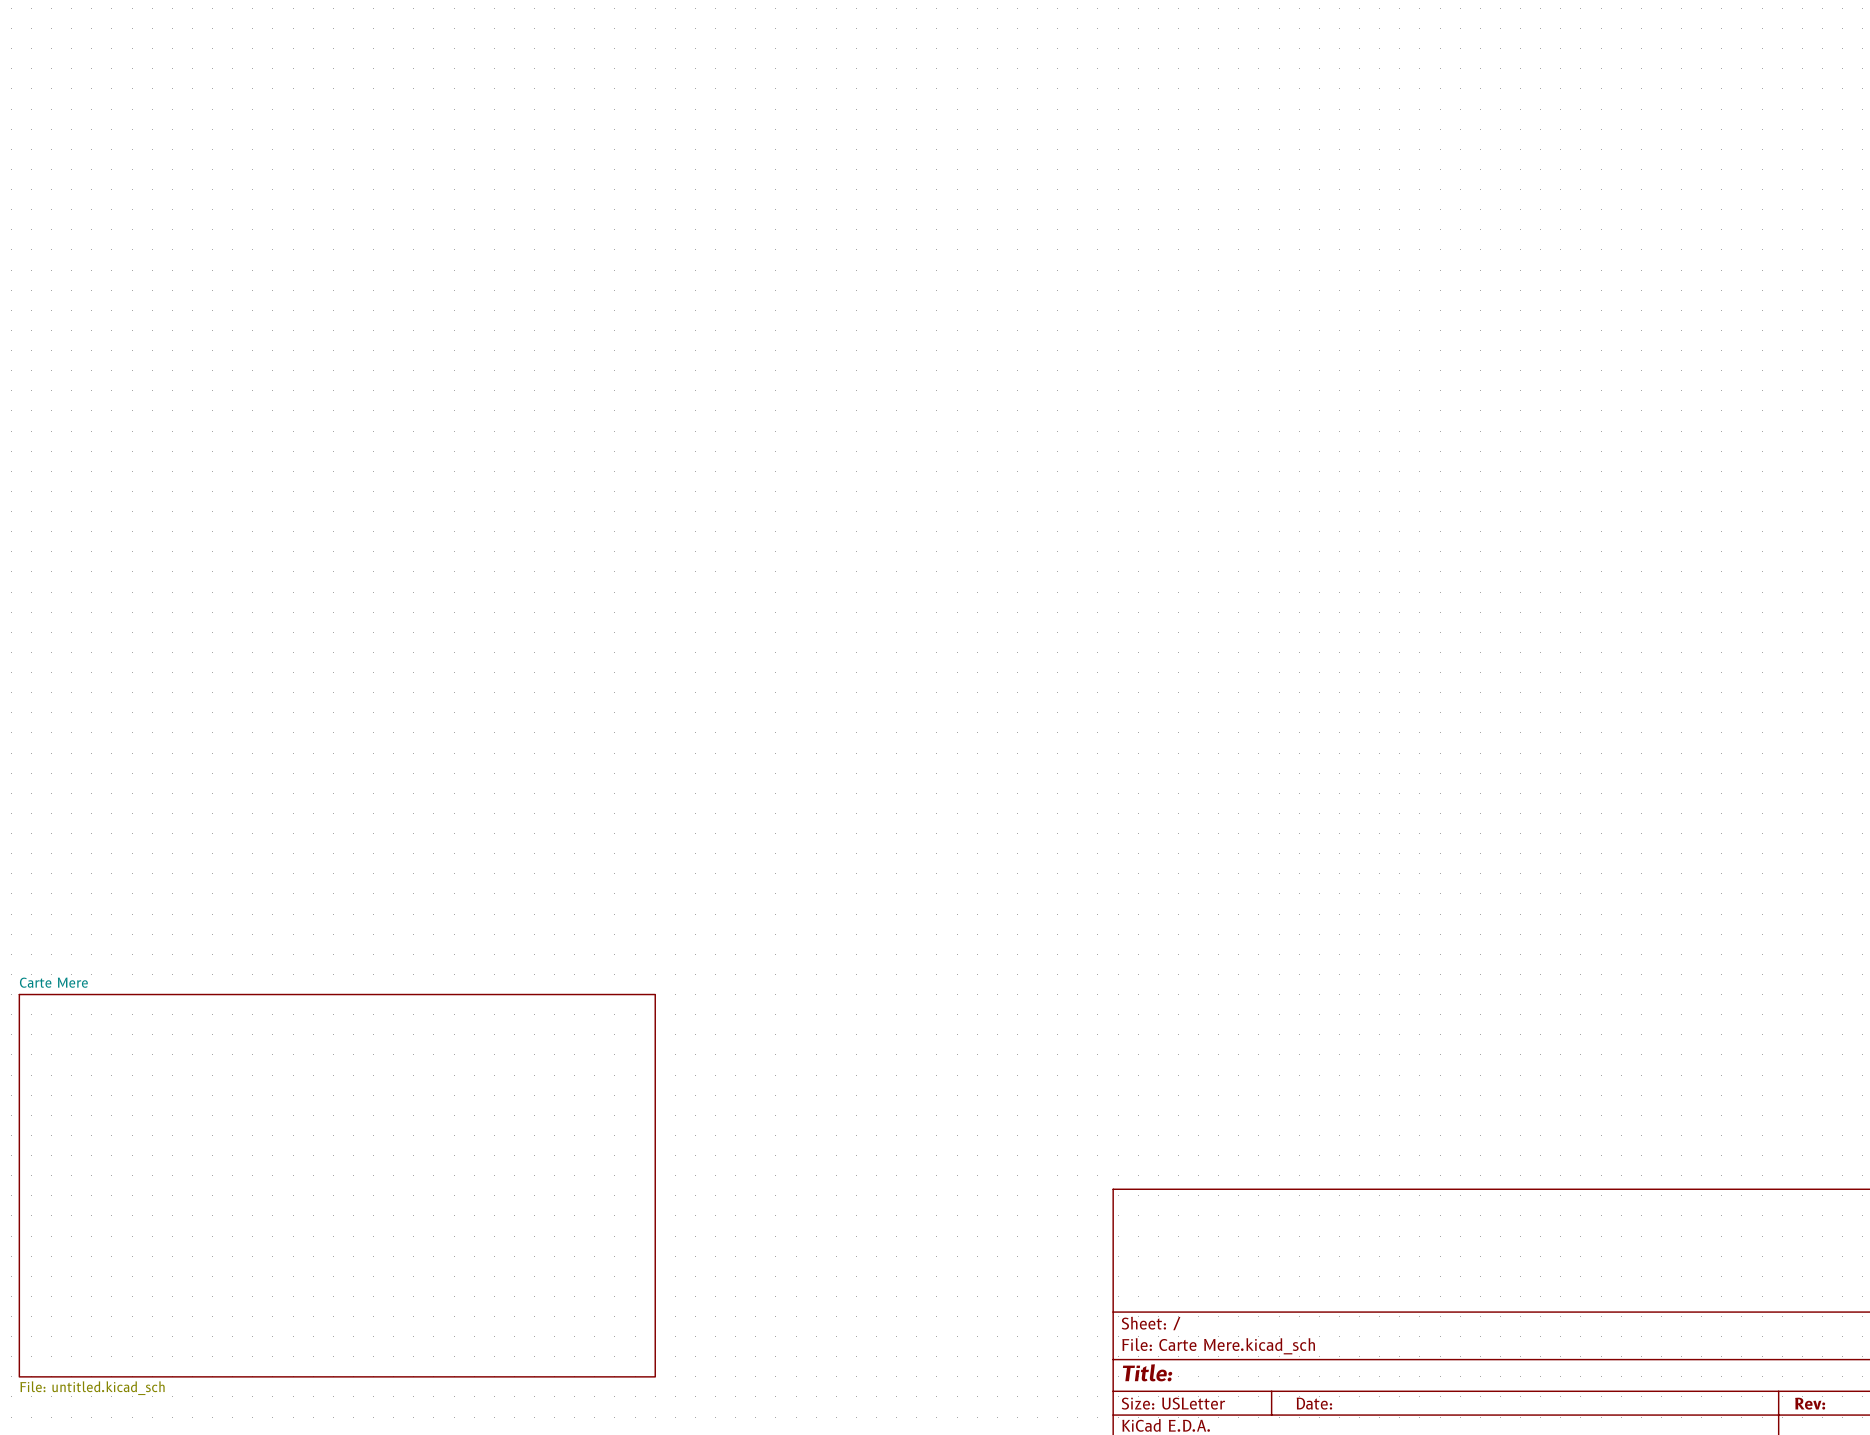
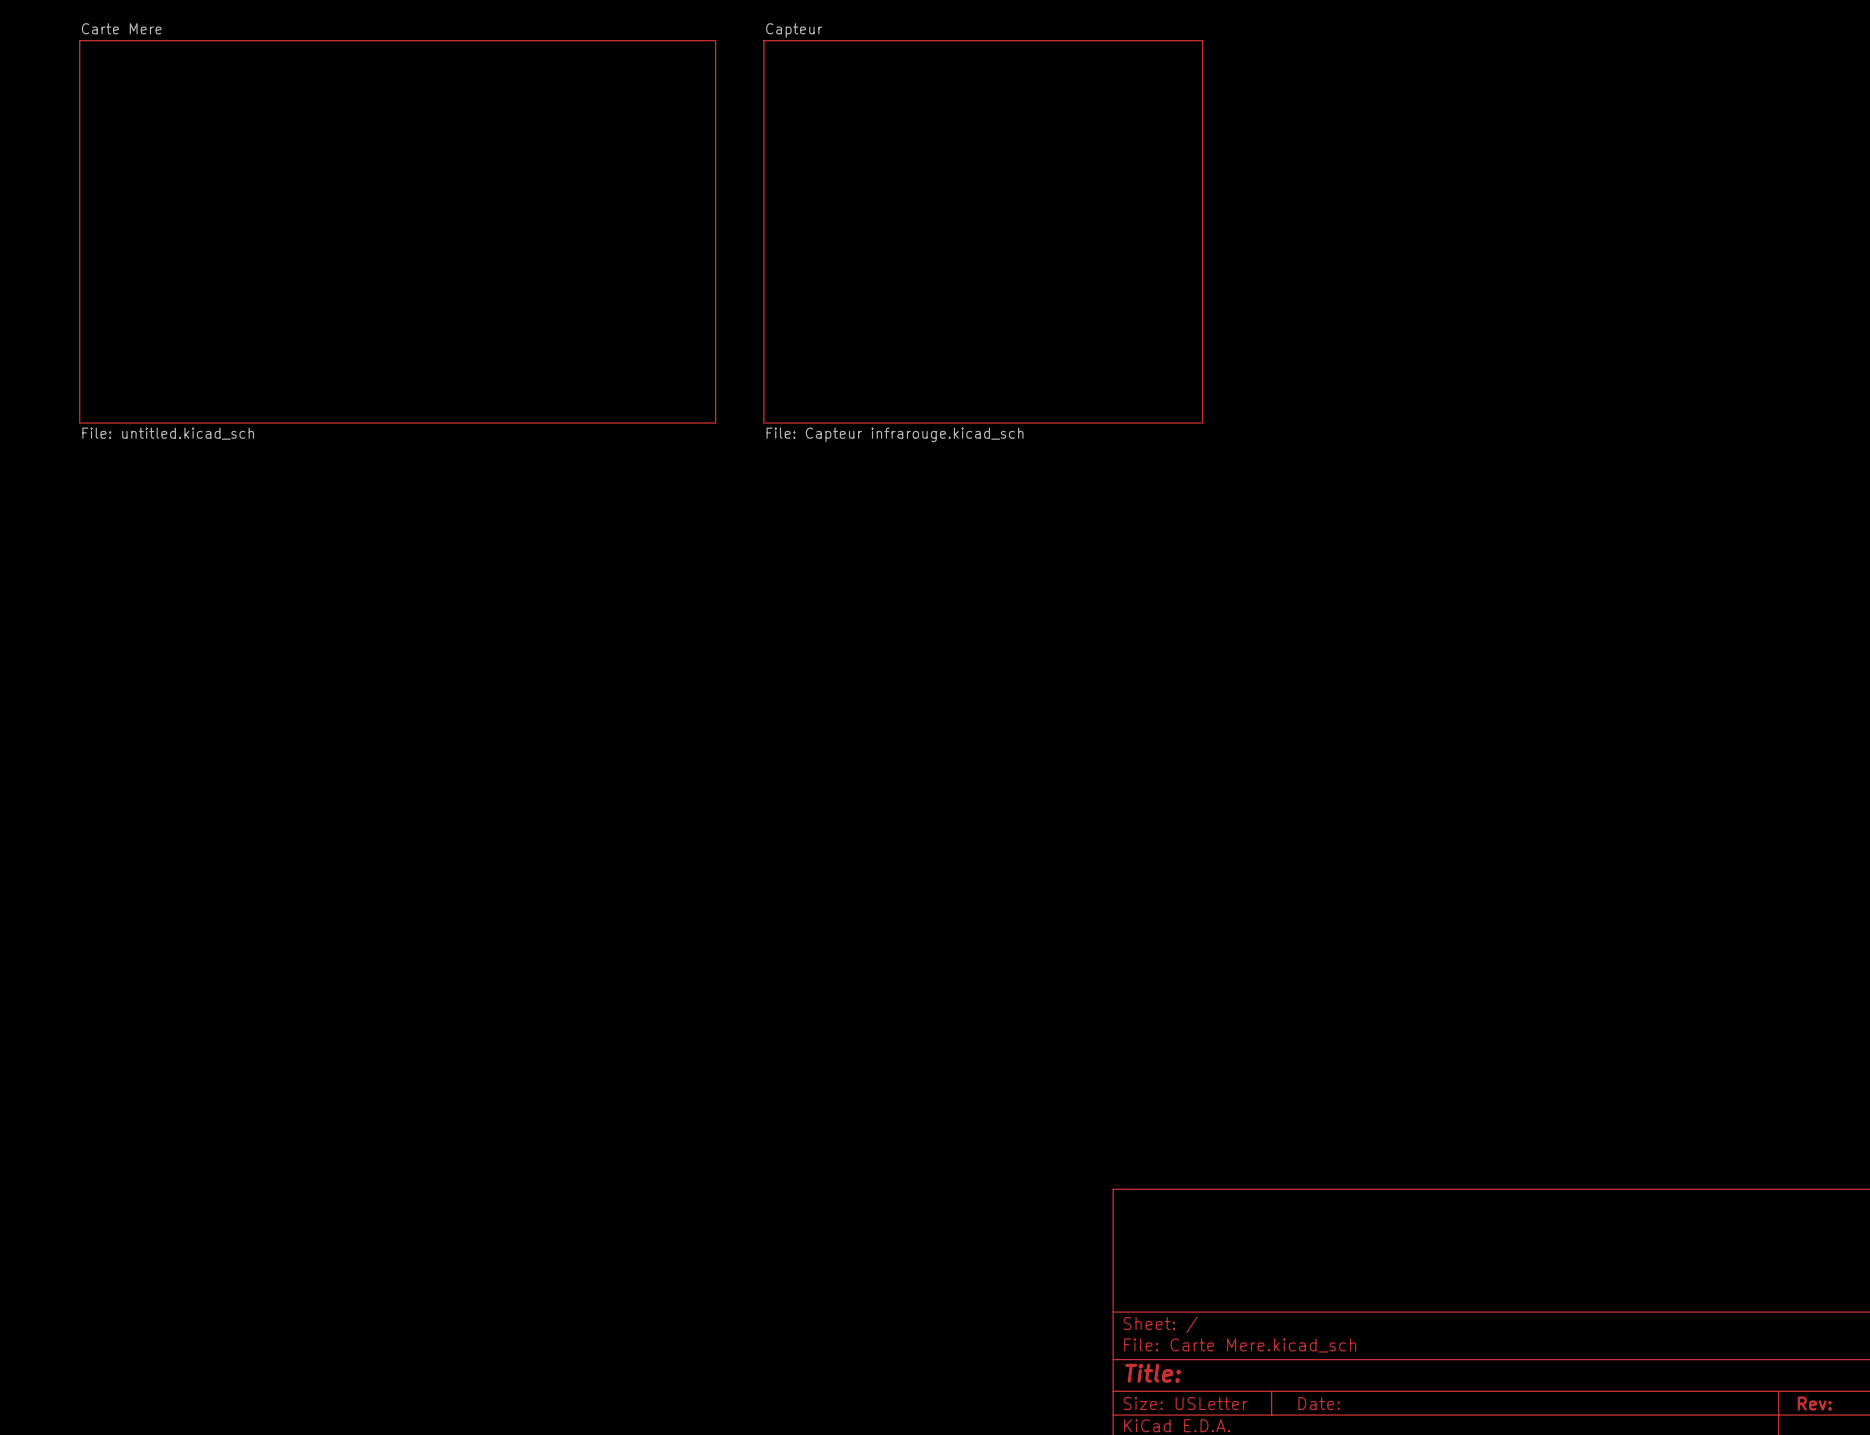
sheet Carte Mere: none -> File: untitled.kicad_sch (397, 231)
sheet Capteur: none -> File: Capteur infrarouge.kicad_sch (983, 231)
sheet Carte Mere: File: untitled.kicad_sch (337, 1185) -> none

